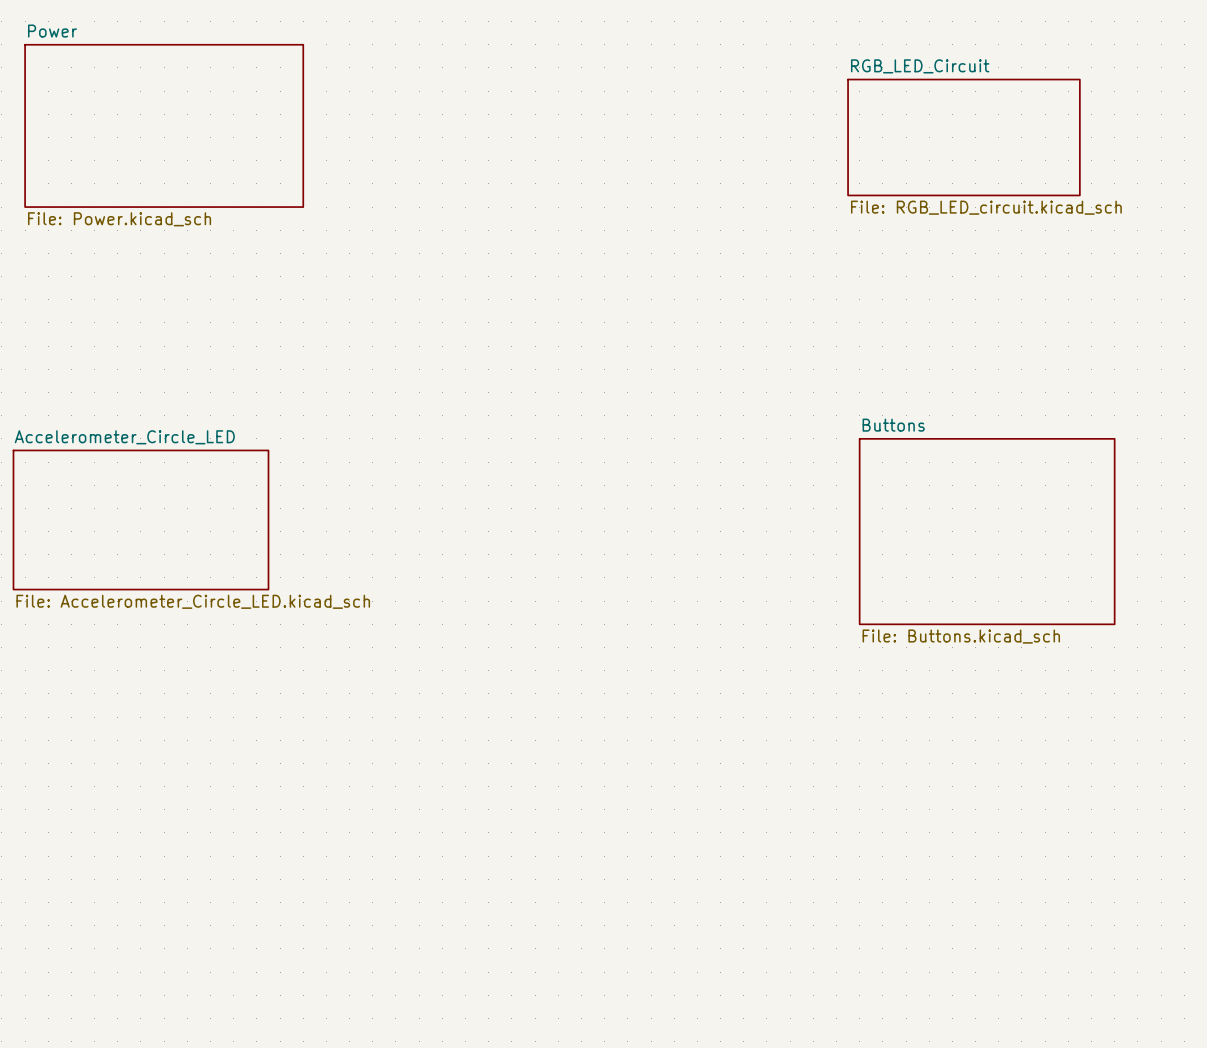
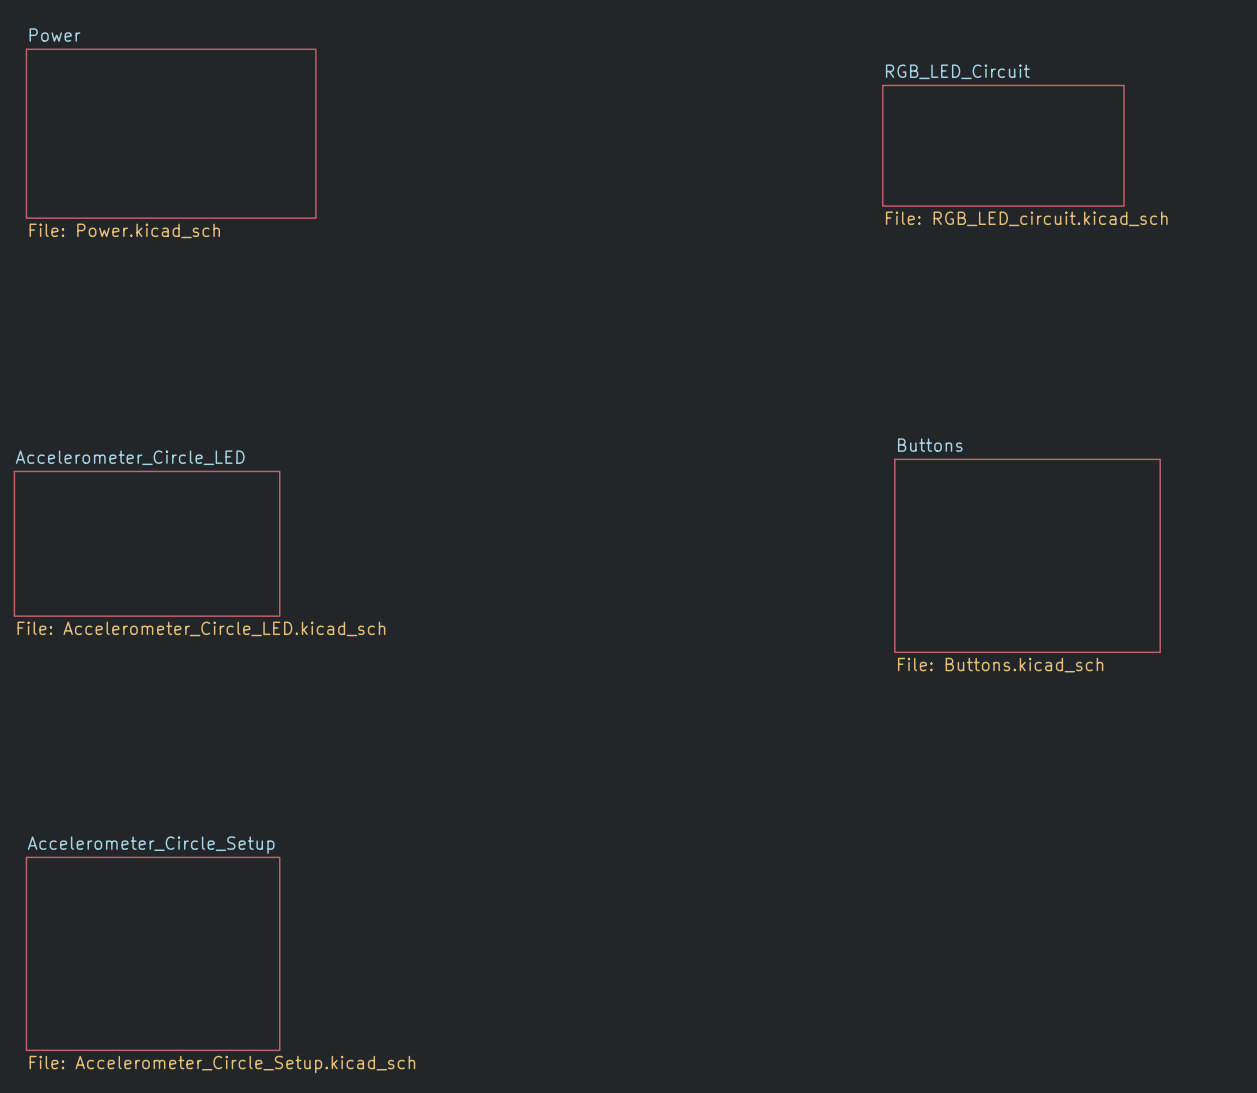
sheet Accelerometer_Circle_Setup: none -> File: Accelerometer_Circle_Setup.kicad_sch (153, 953)

